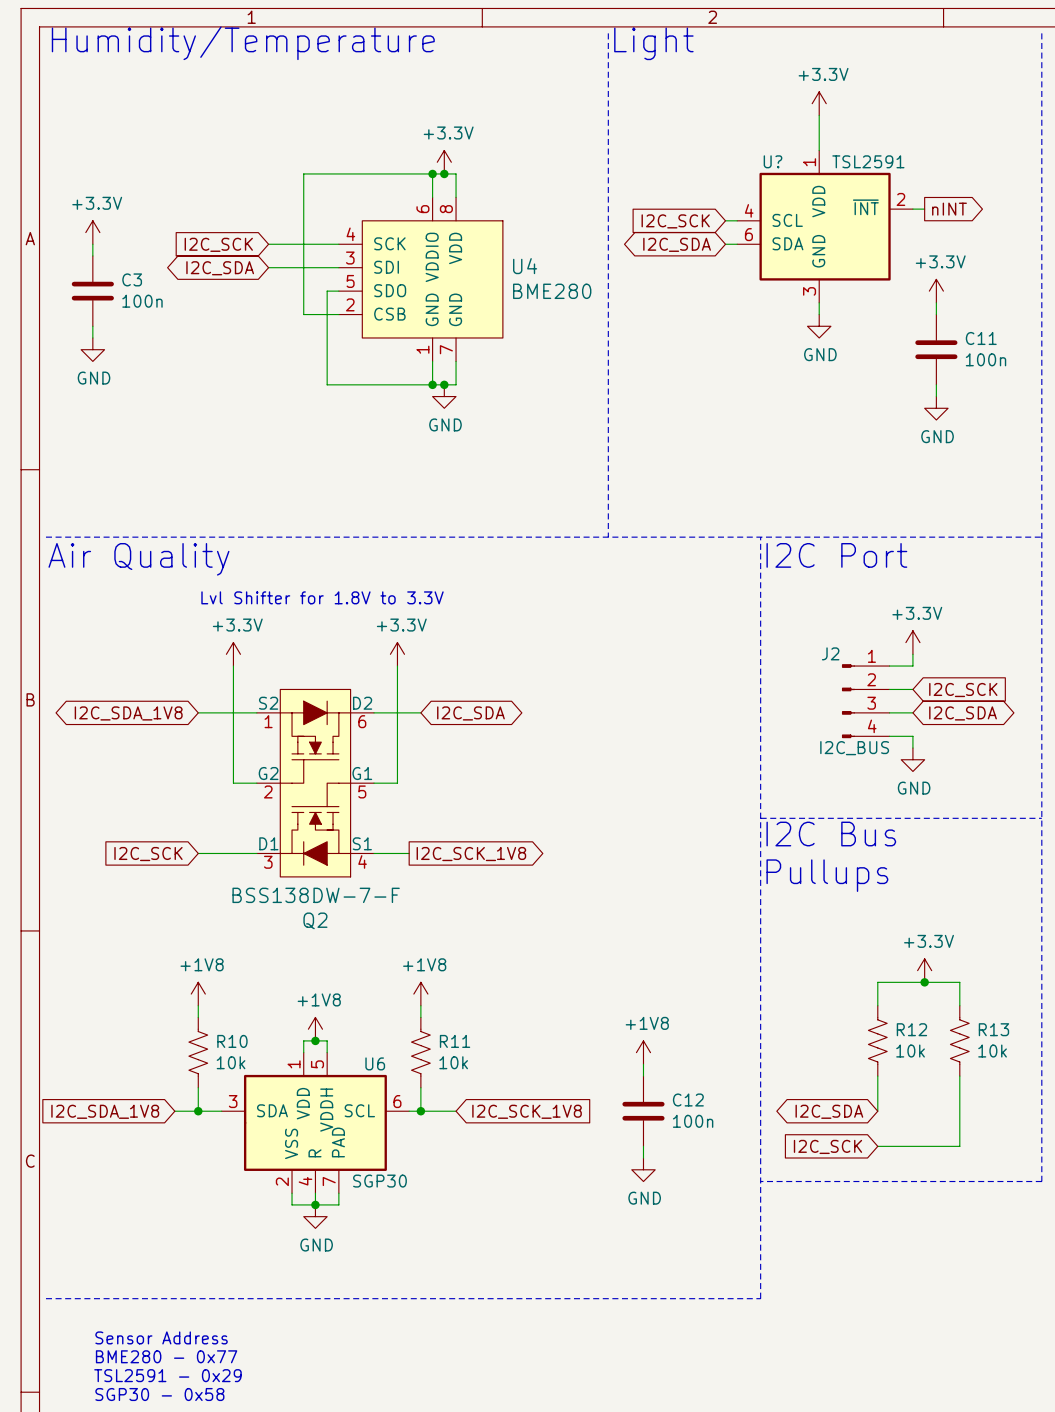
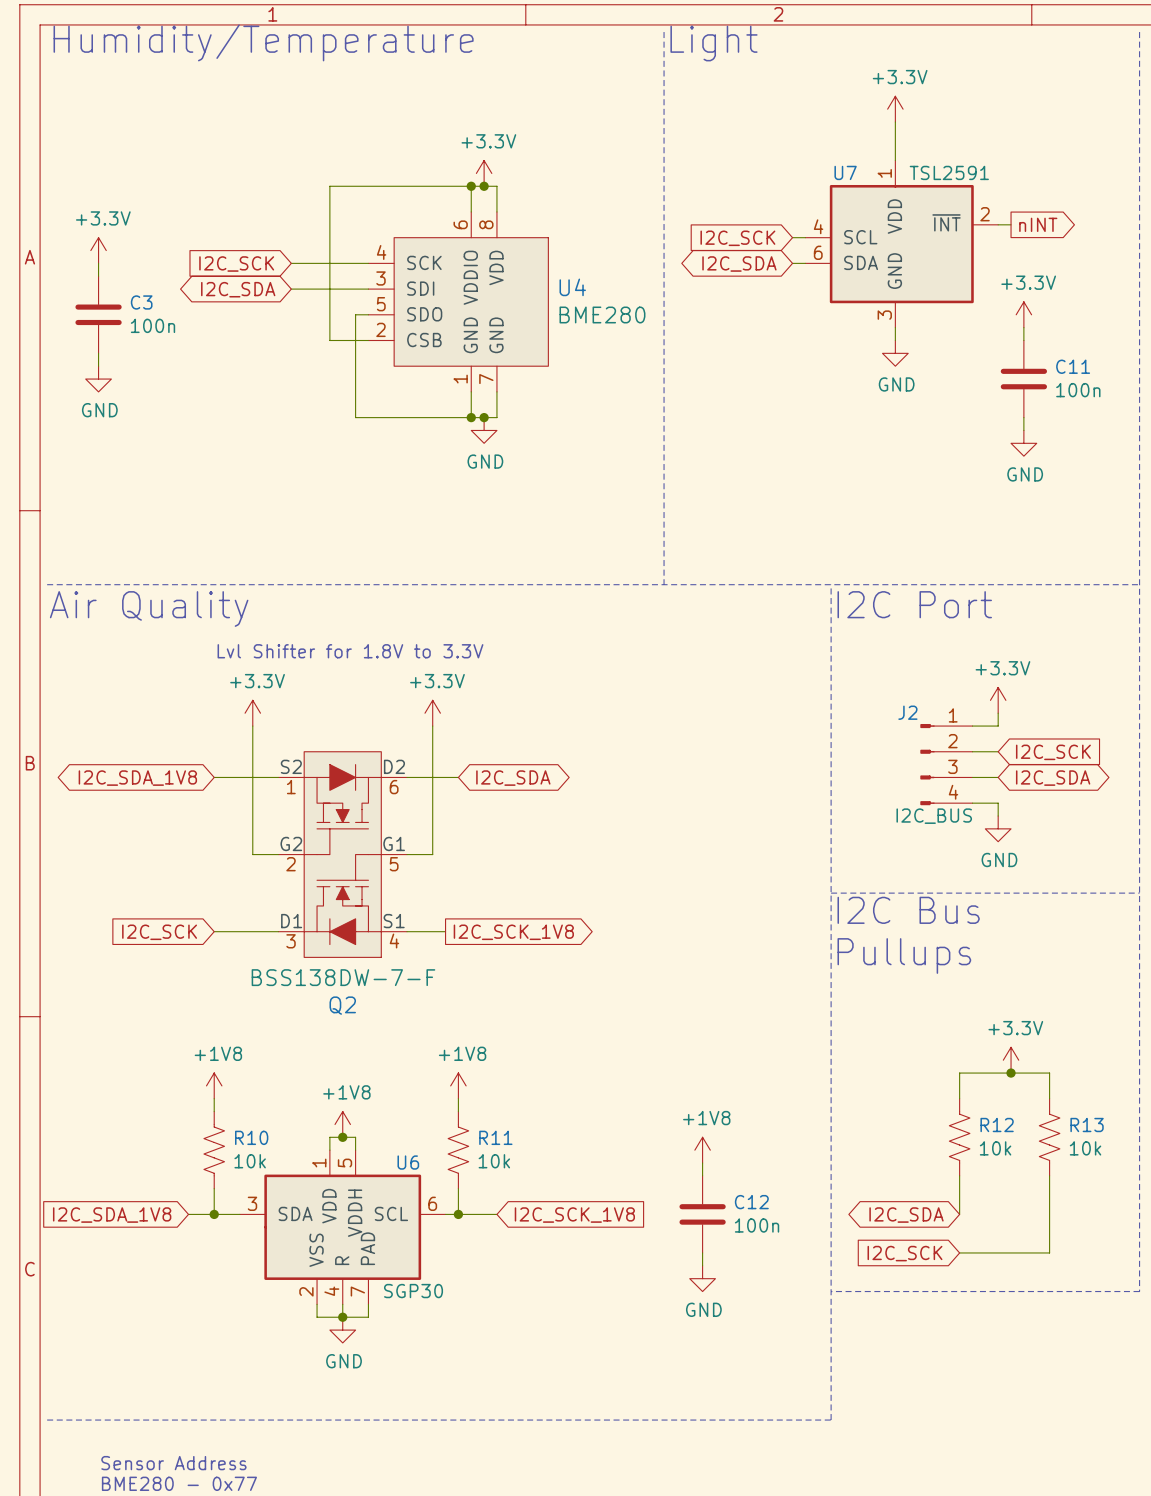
U? name: U? (773, 161) -> U7 (845, 172)

